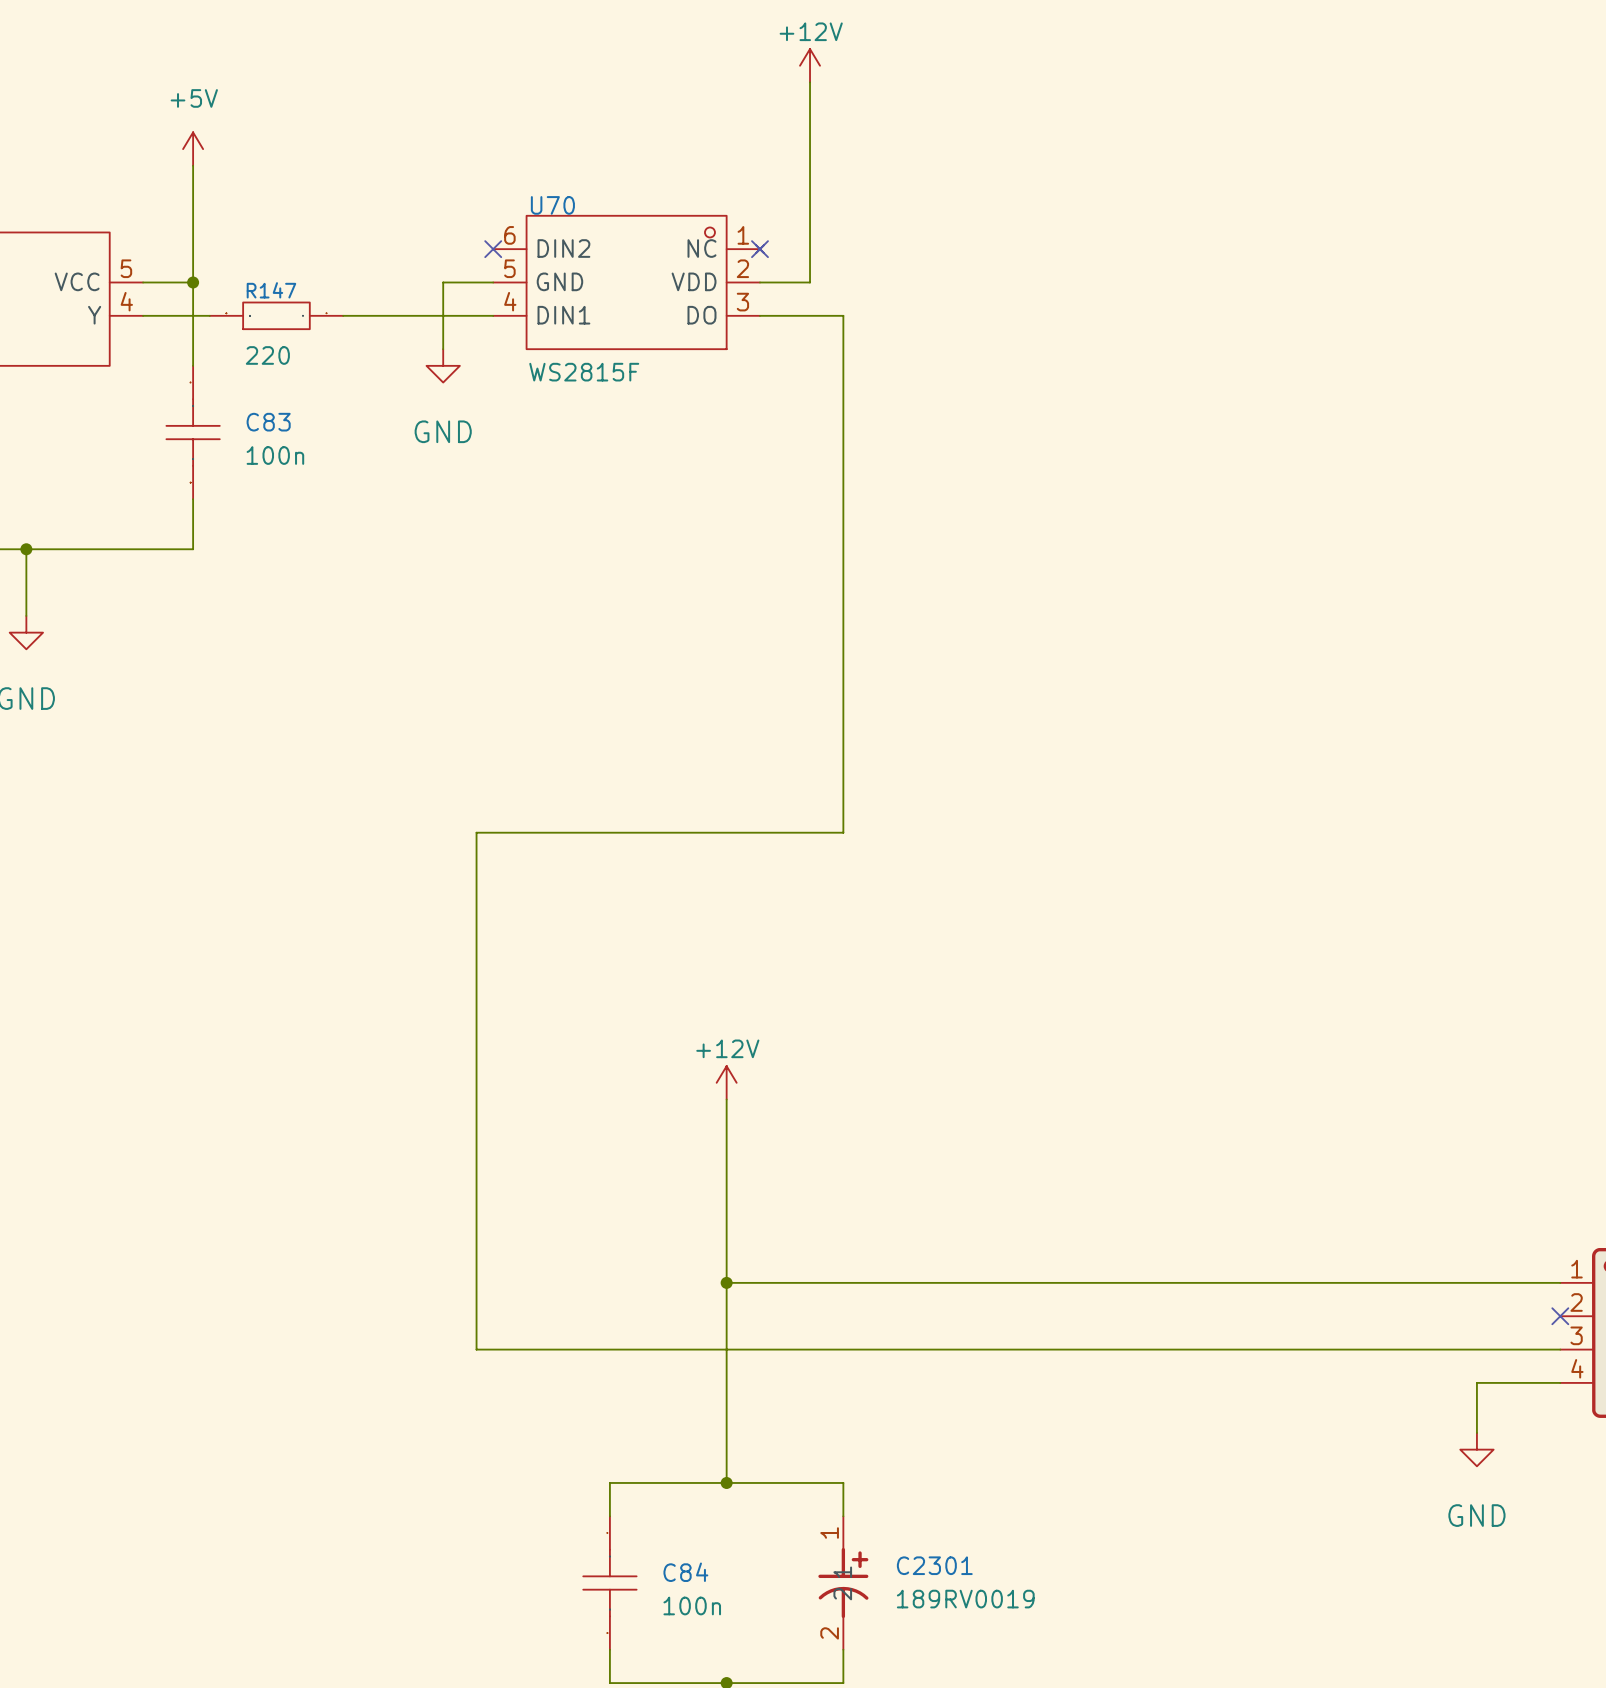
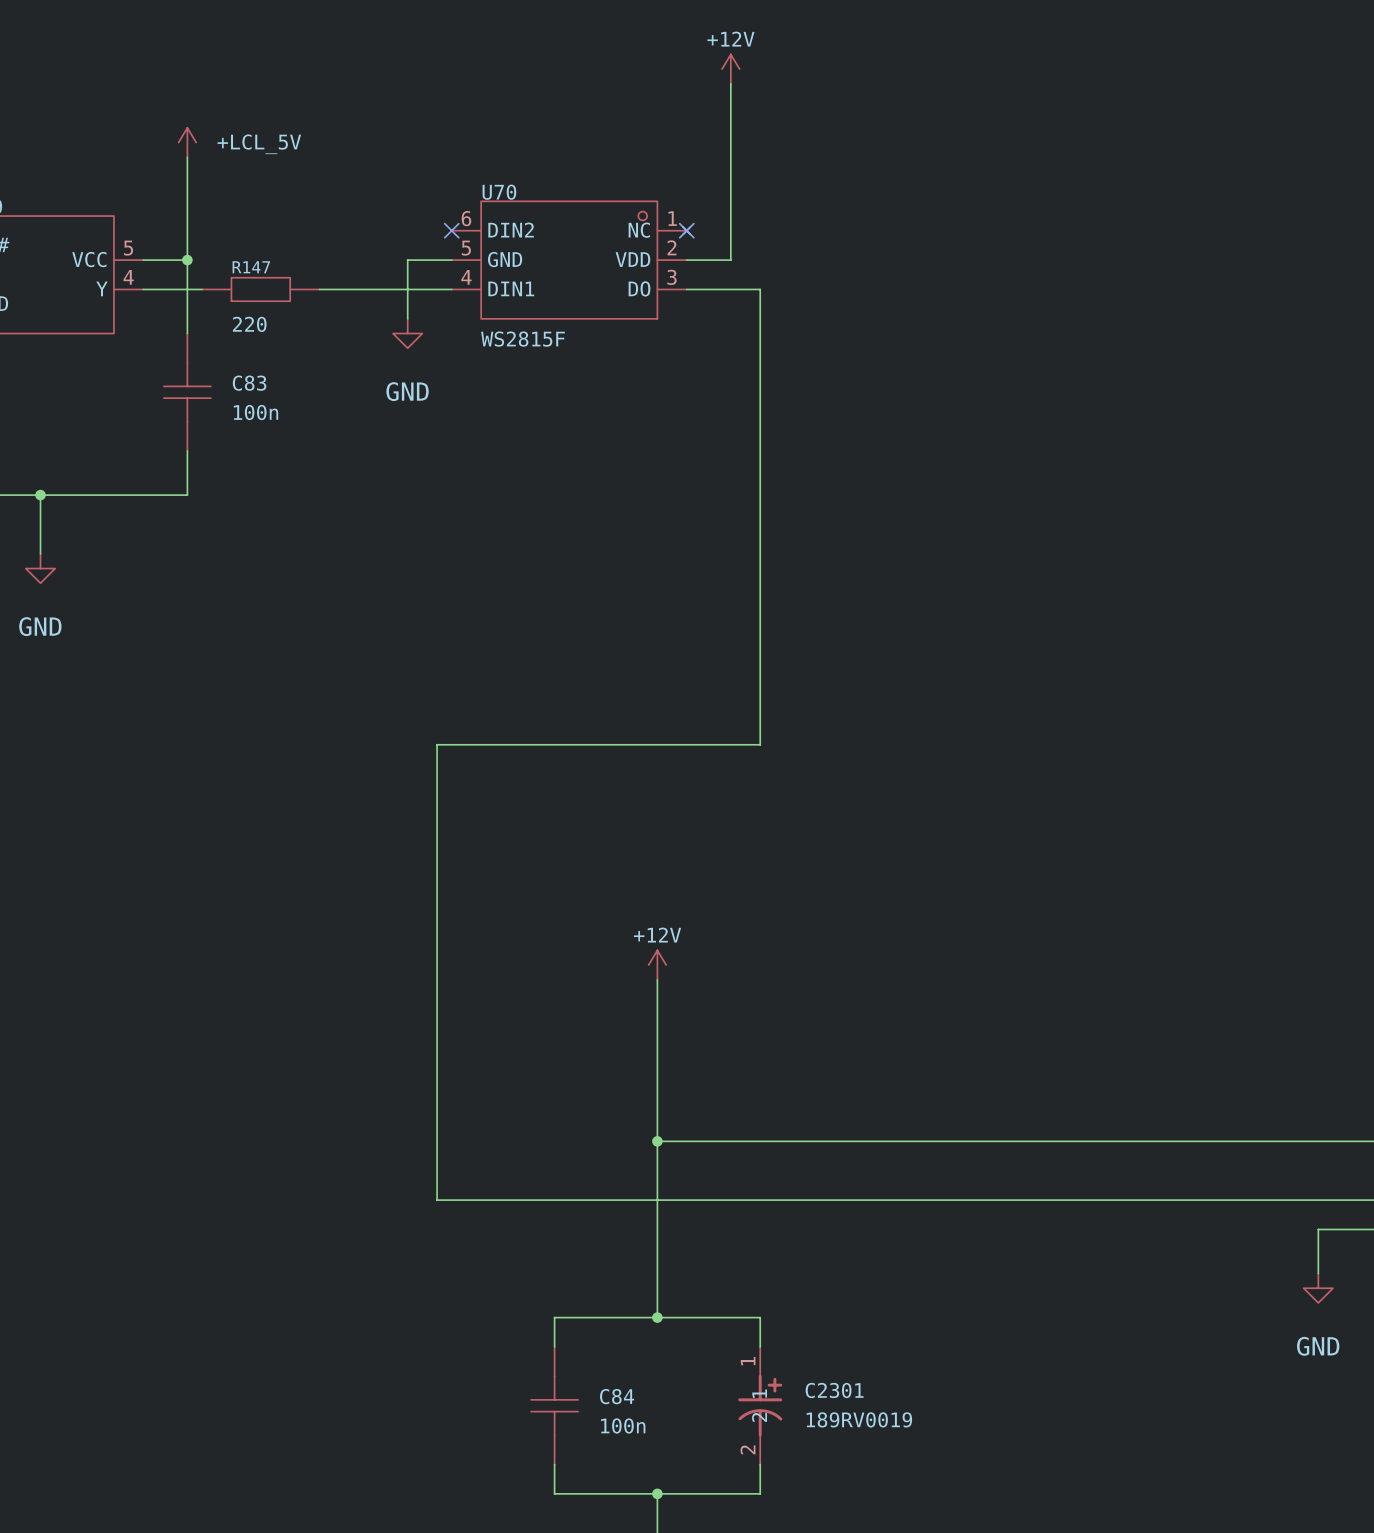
power symbol: +5V (193, 149) -> +LCL_5V (187, 142)

